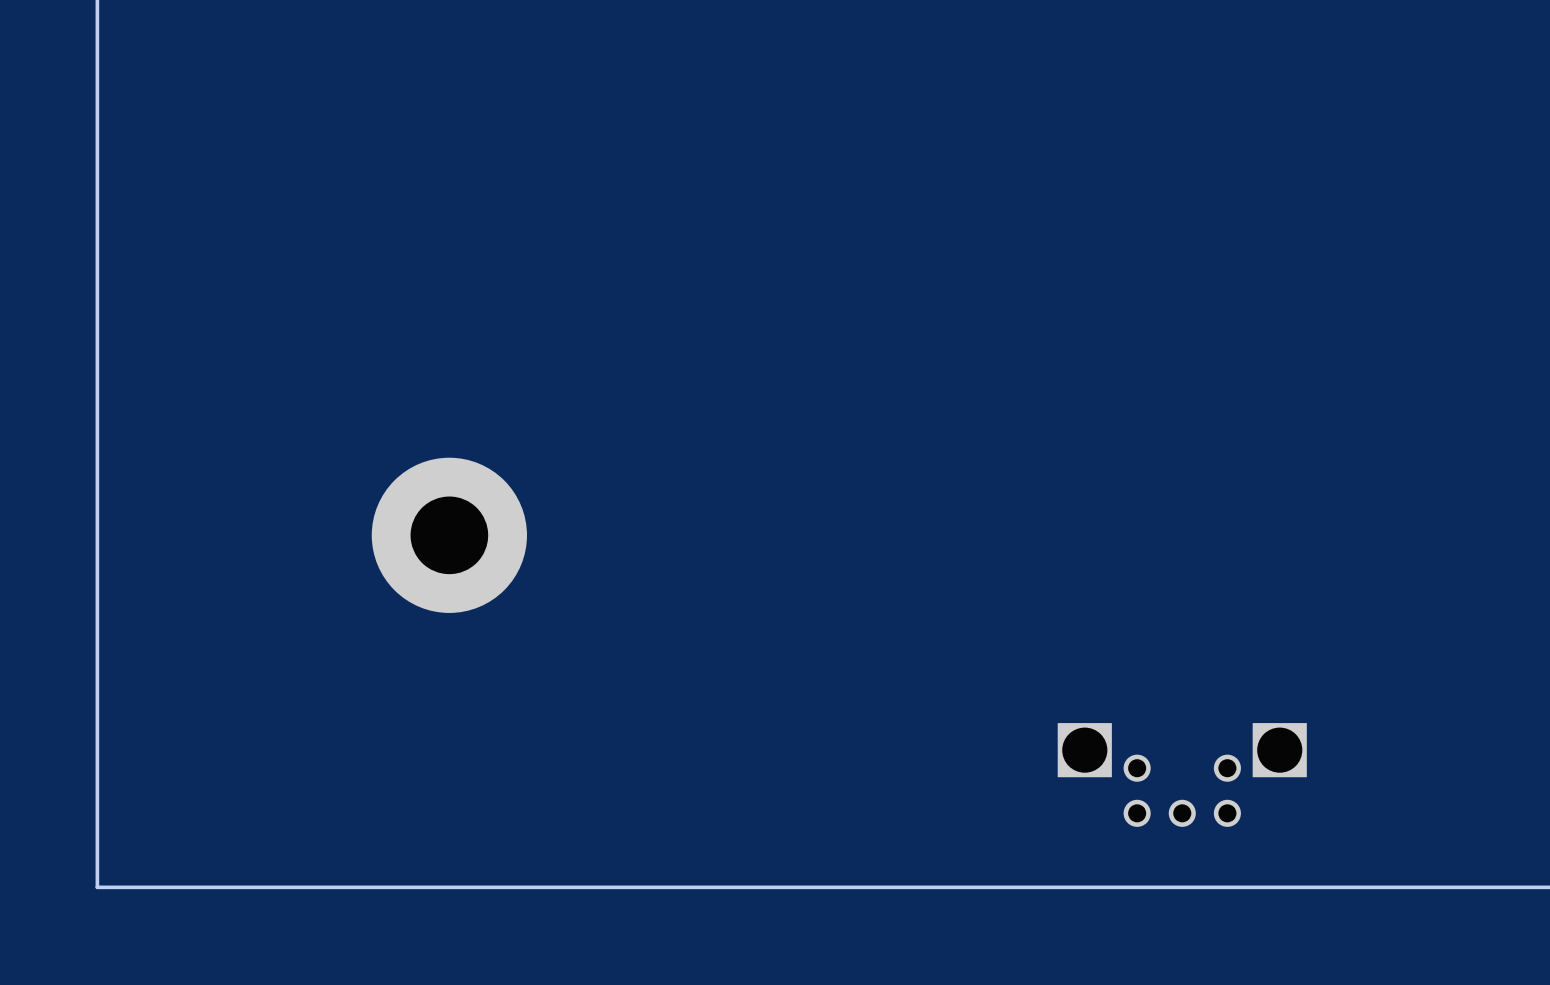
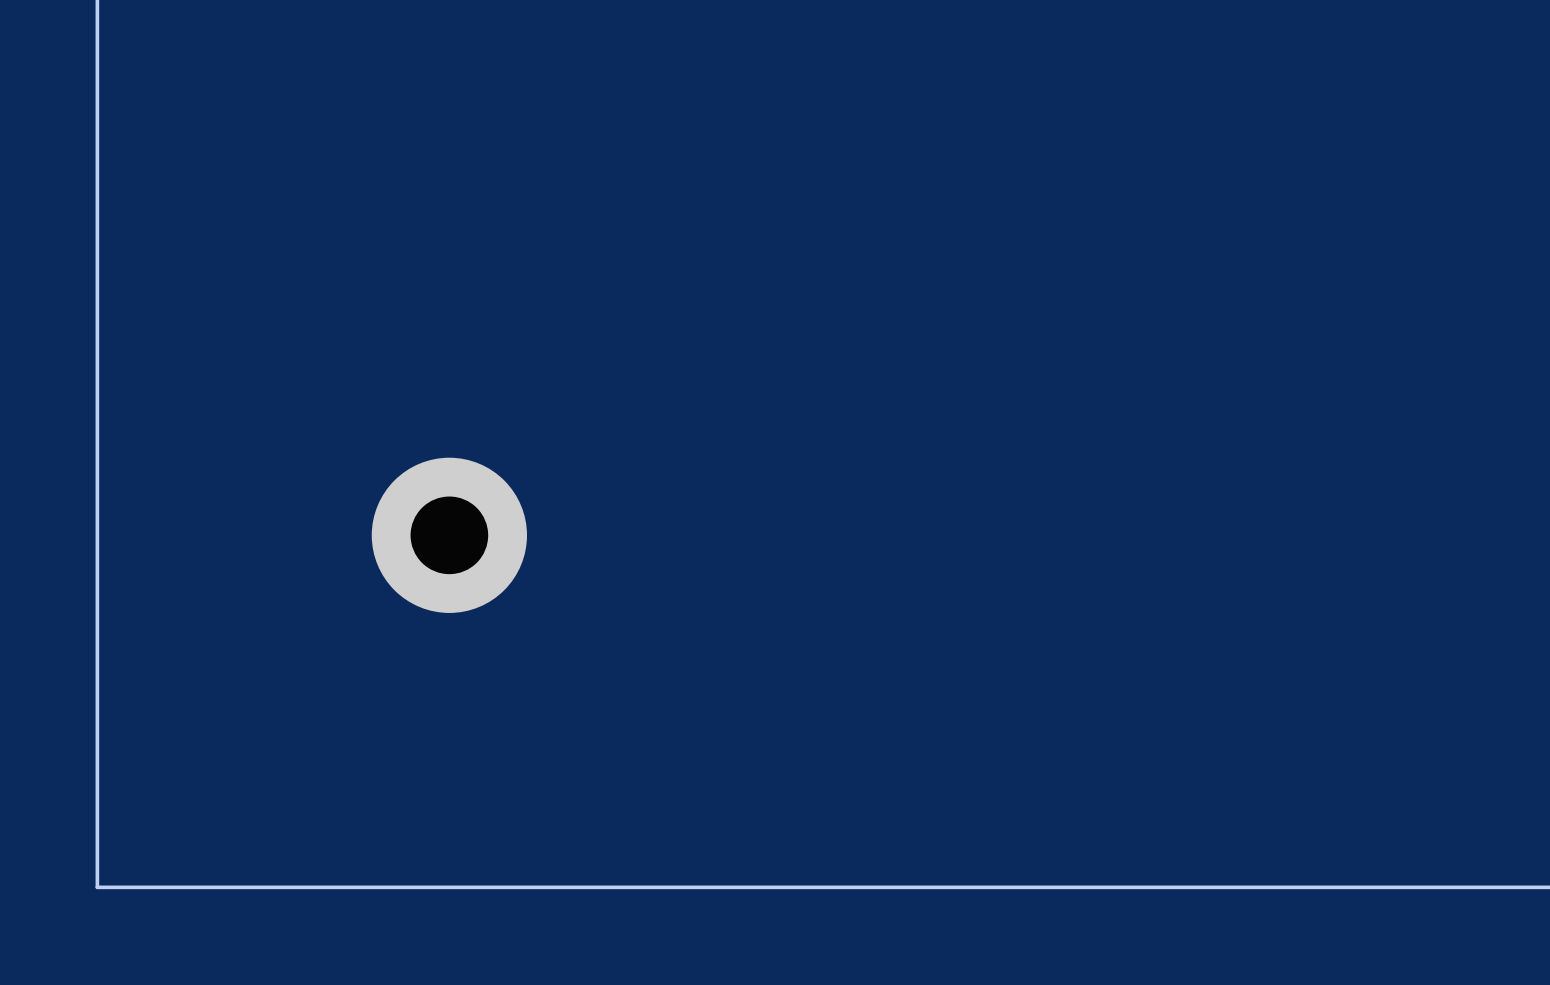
part: (1182, 774) -> none

